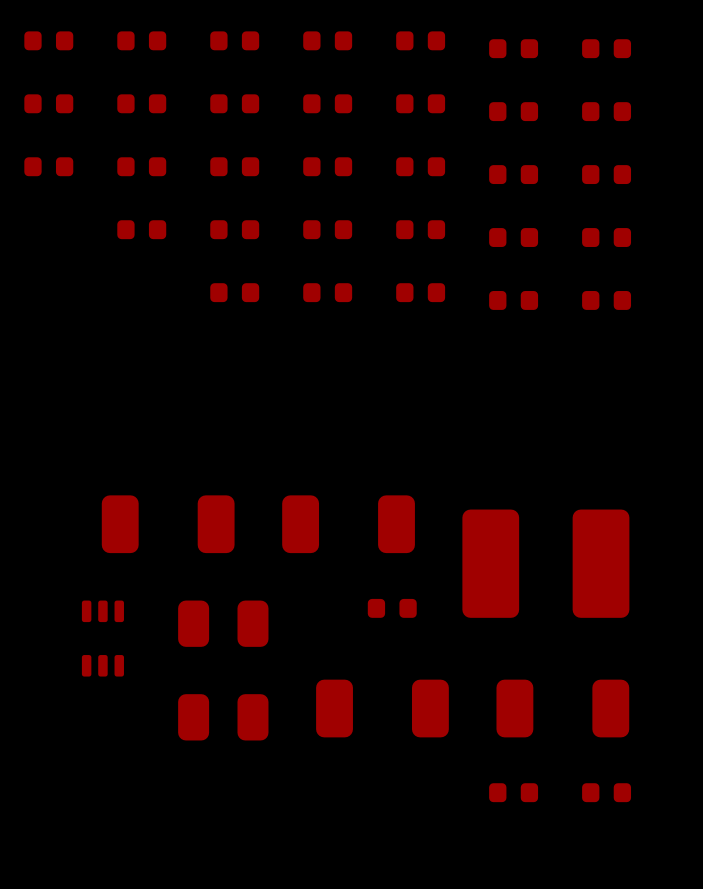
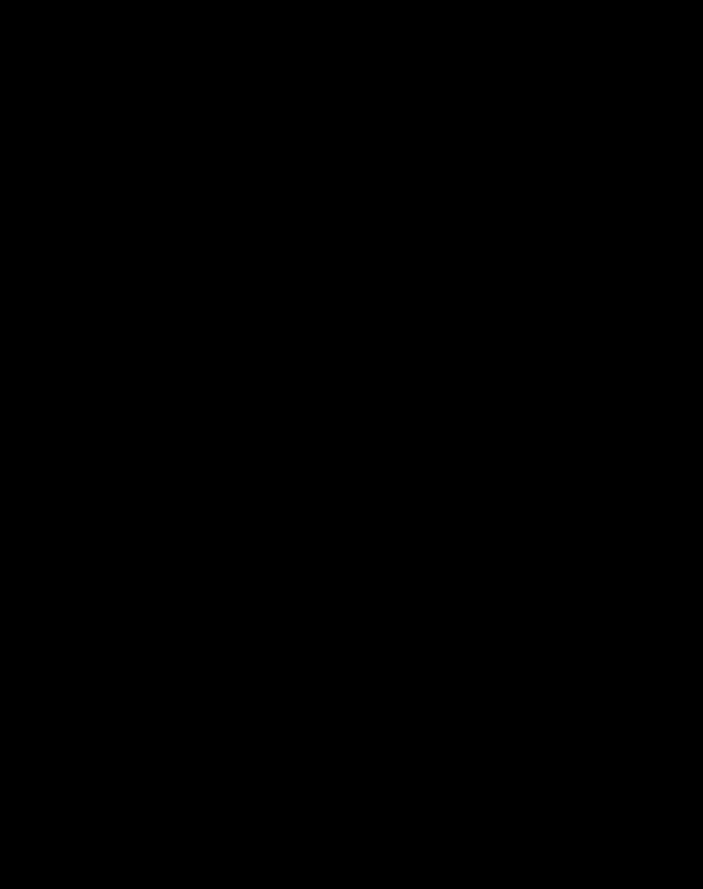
part: (48, 40) -> none
part: (141, 40) -> none
part: (234, 40) -> none
part: (327, 40) -> none
part: (420, 40) -> none
part: (513, 48) -> none
part: (606, 48) -> none
part: (48, 103) -> none
part: (141, 103) -> none
part: (234, 103) -> none
part: (327, 103) -> none
part: (420, 103) -> none
part: (513, 111) -> none
part: (606, 111) -> none
part: (48, 166) -> none
part: (141, 166) -> none
part: (234, 166) -> none
part: (327, 166) -> none
part: (420, 166) -> none
part: (513, 174) -> none
part: (606, 174) -> none
part: (141, 229) -> none
part: (234, 229) -> none
part: (327, 229) -> none
part: (420, 229) -> none
part: (513, 237) -> none
part: (606, 237) -> none
part: (234, 292) -> none
part: (327, 292) -> none
part: (420, 292) -> none
part: (513, 300) -> none
part: (606, 300) -> none
part: (168, 524) -> none
part: (348, 524) -> none
part: (545, 563) -> none
part: (392, 608) -> none
part: (223, 623) -> none
part: (102, 638) -> none
part: (382, 708) -> none
part: (562, 708) -> none
part: (223, 717) -> none
part: (513, 792) -> none
part: (606, 792) -> none

